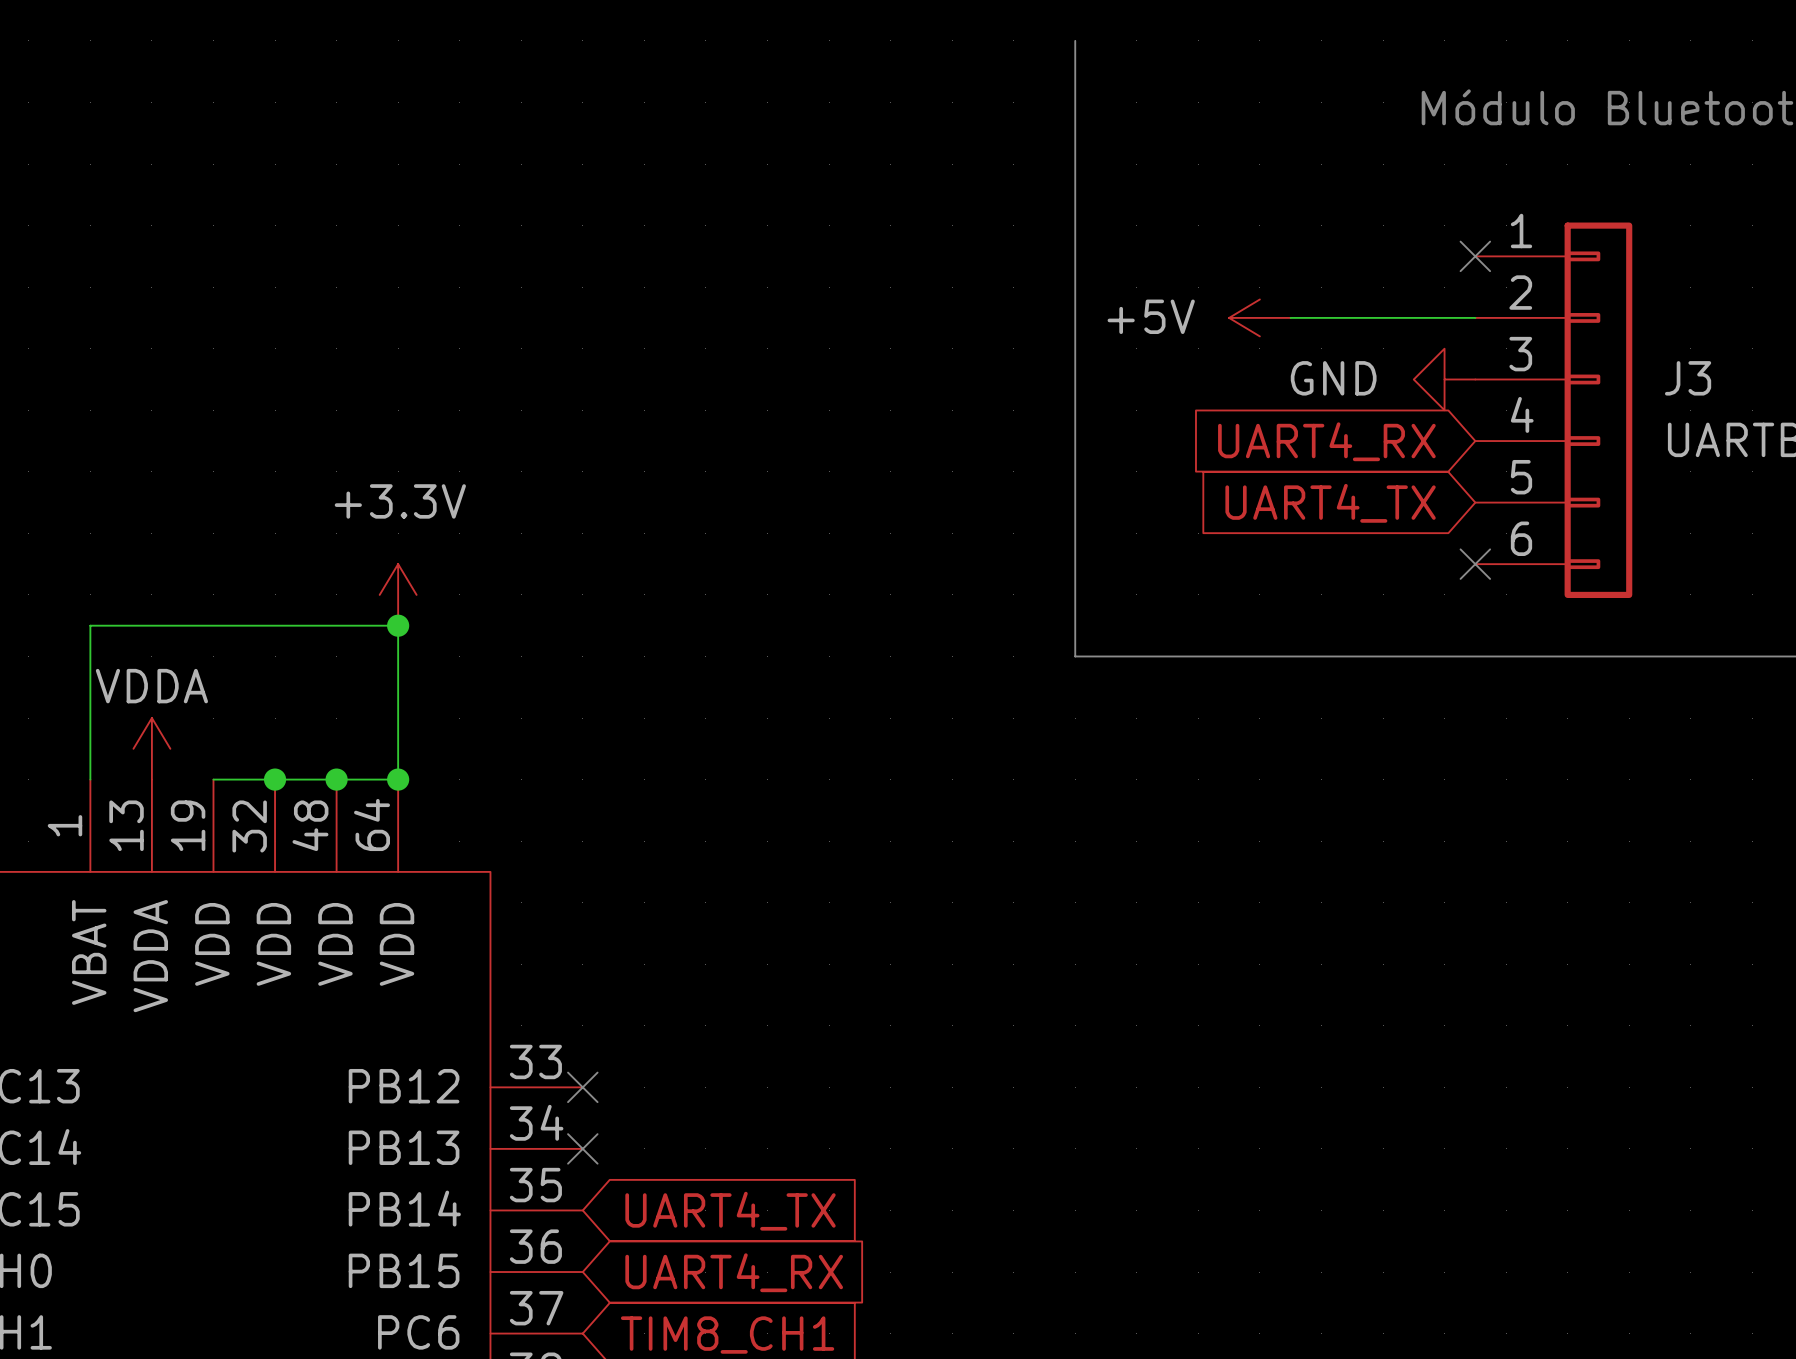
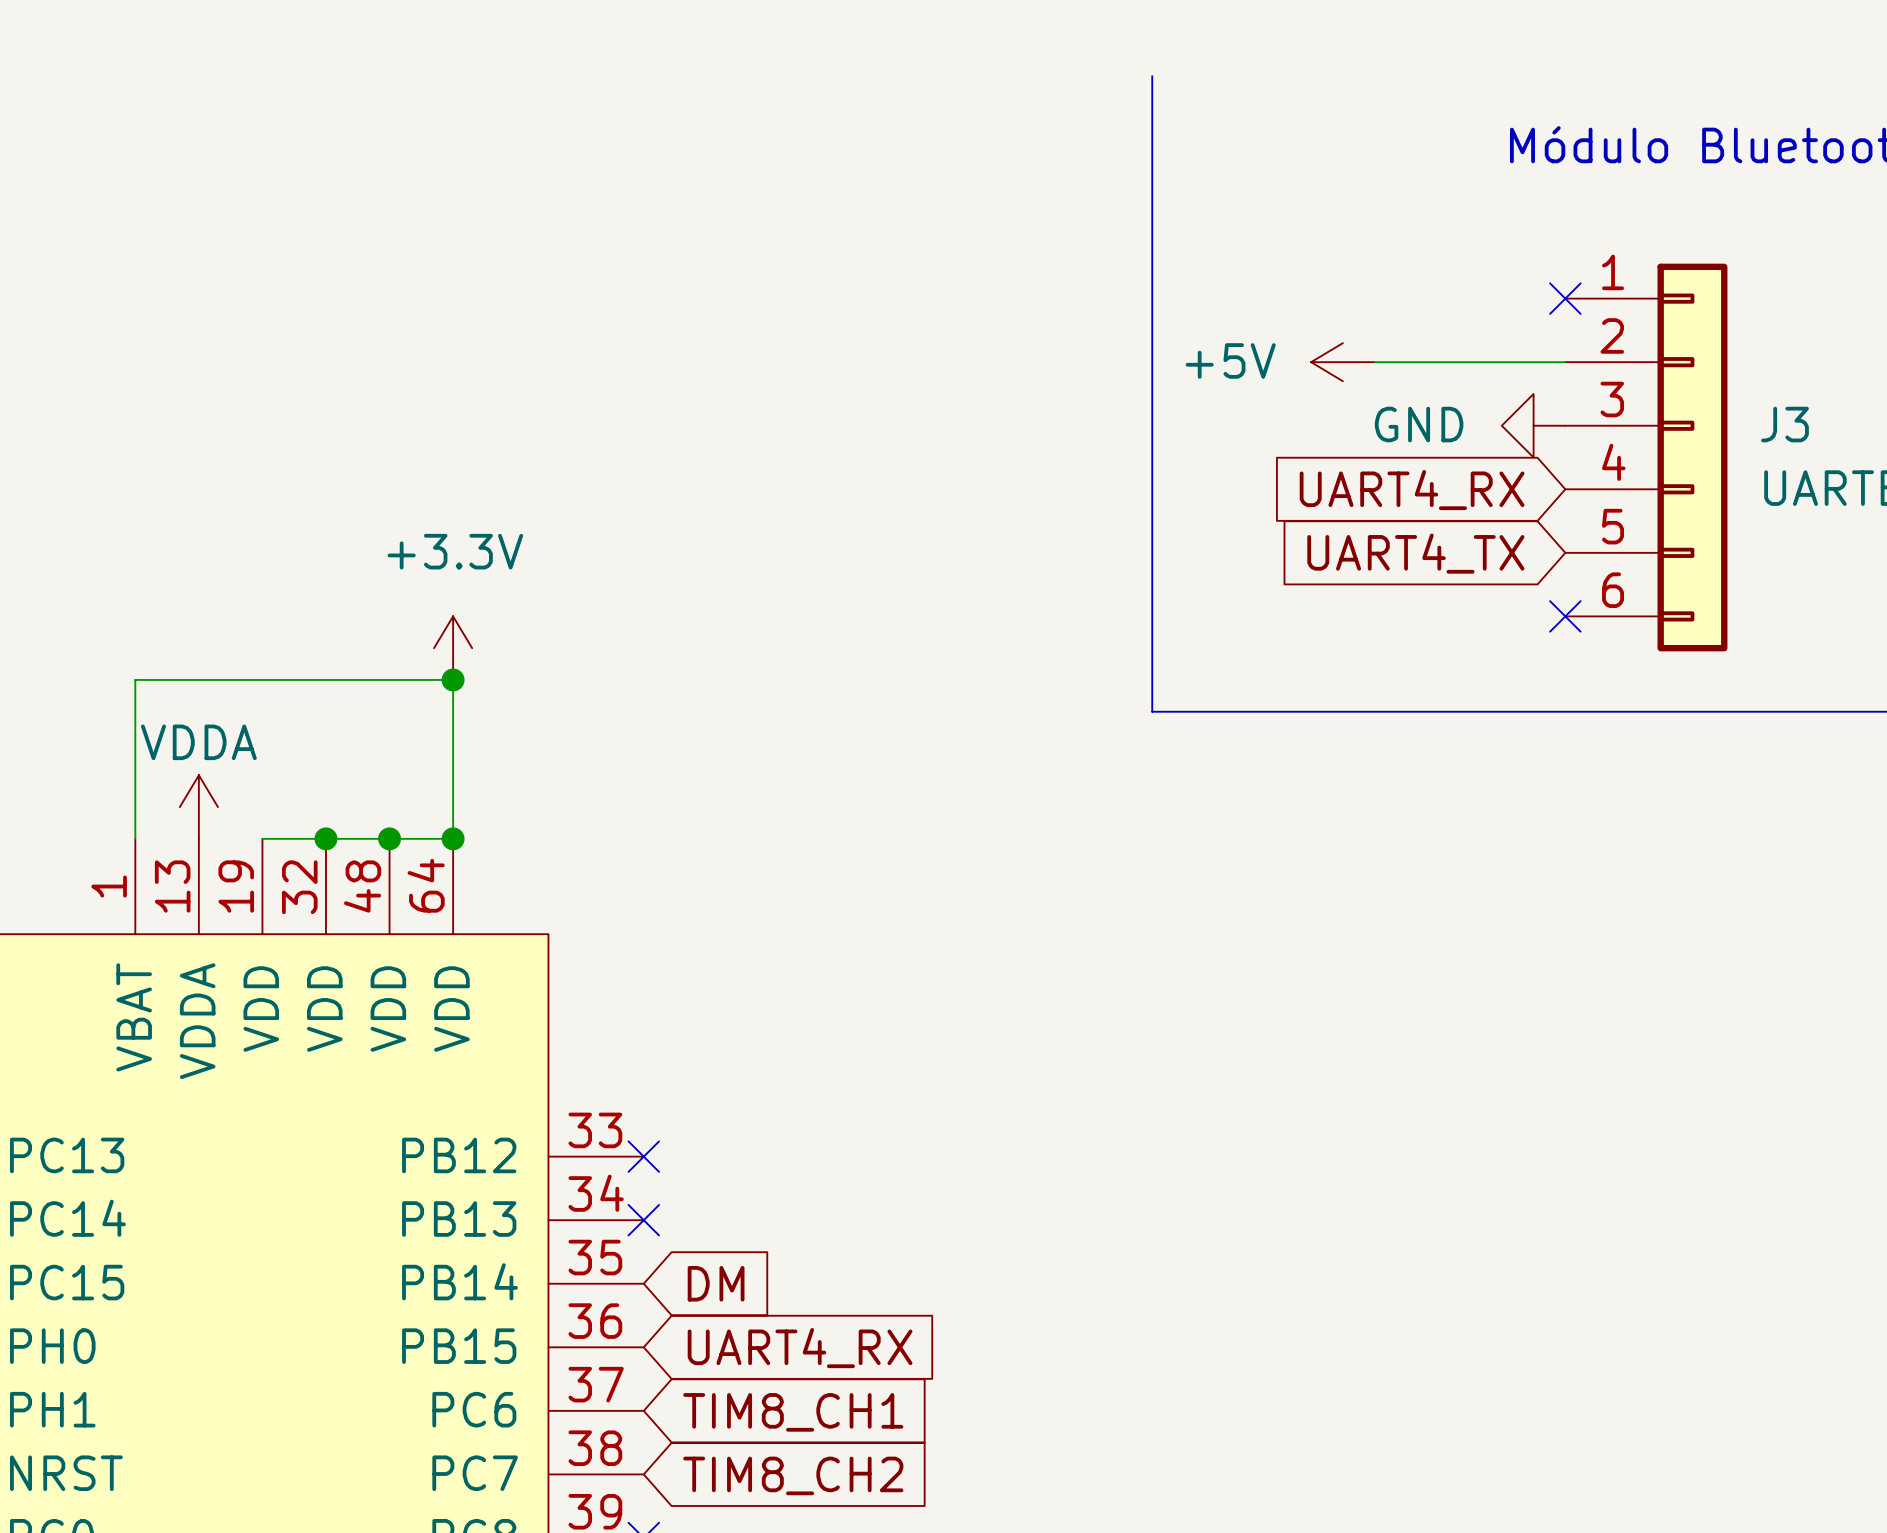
global label: UART4_TX (730, 1211) -> DM (716, 1283)

